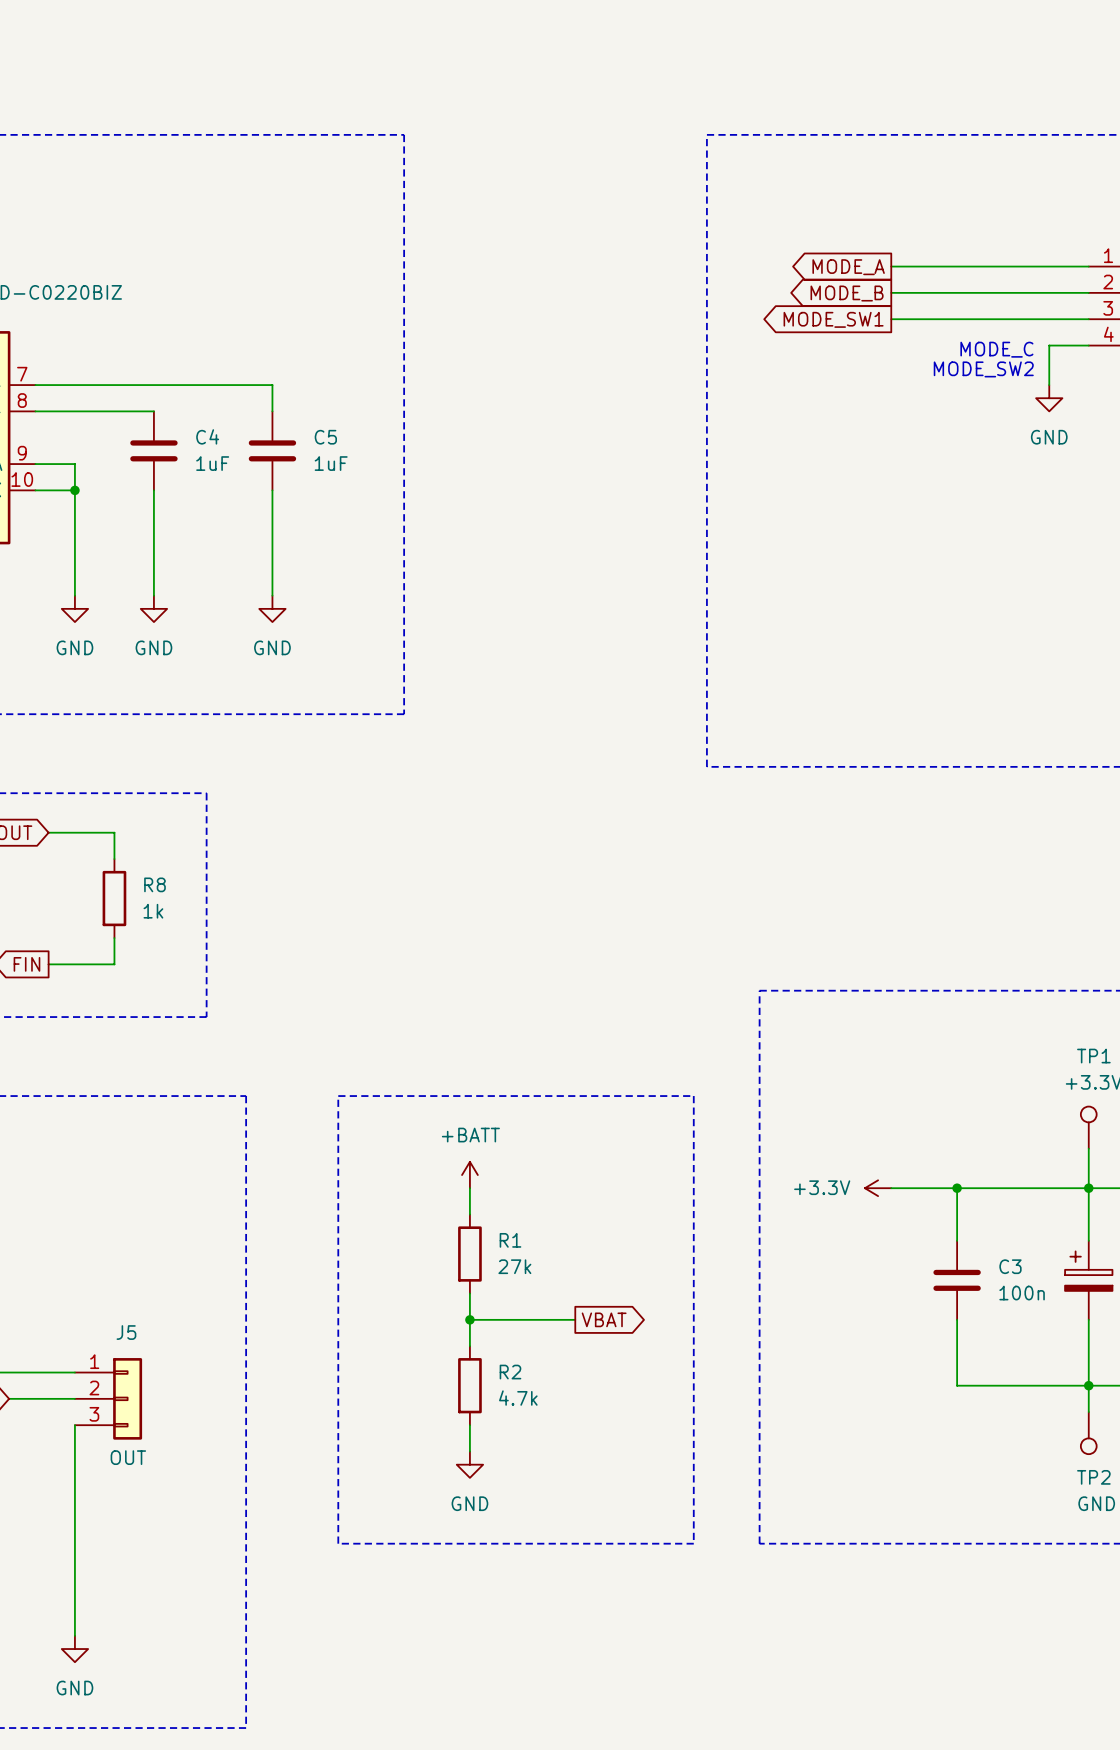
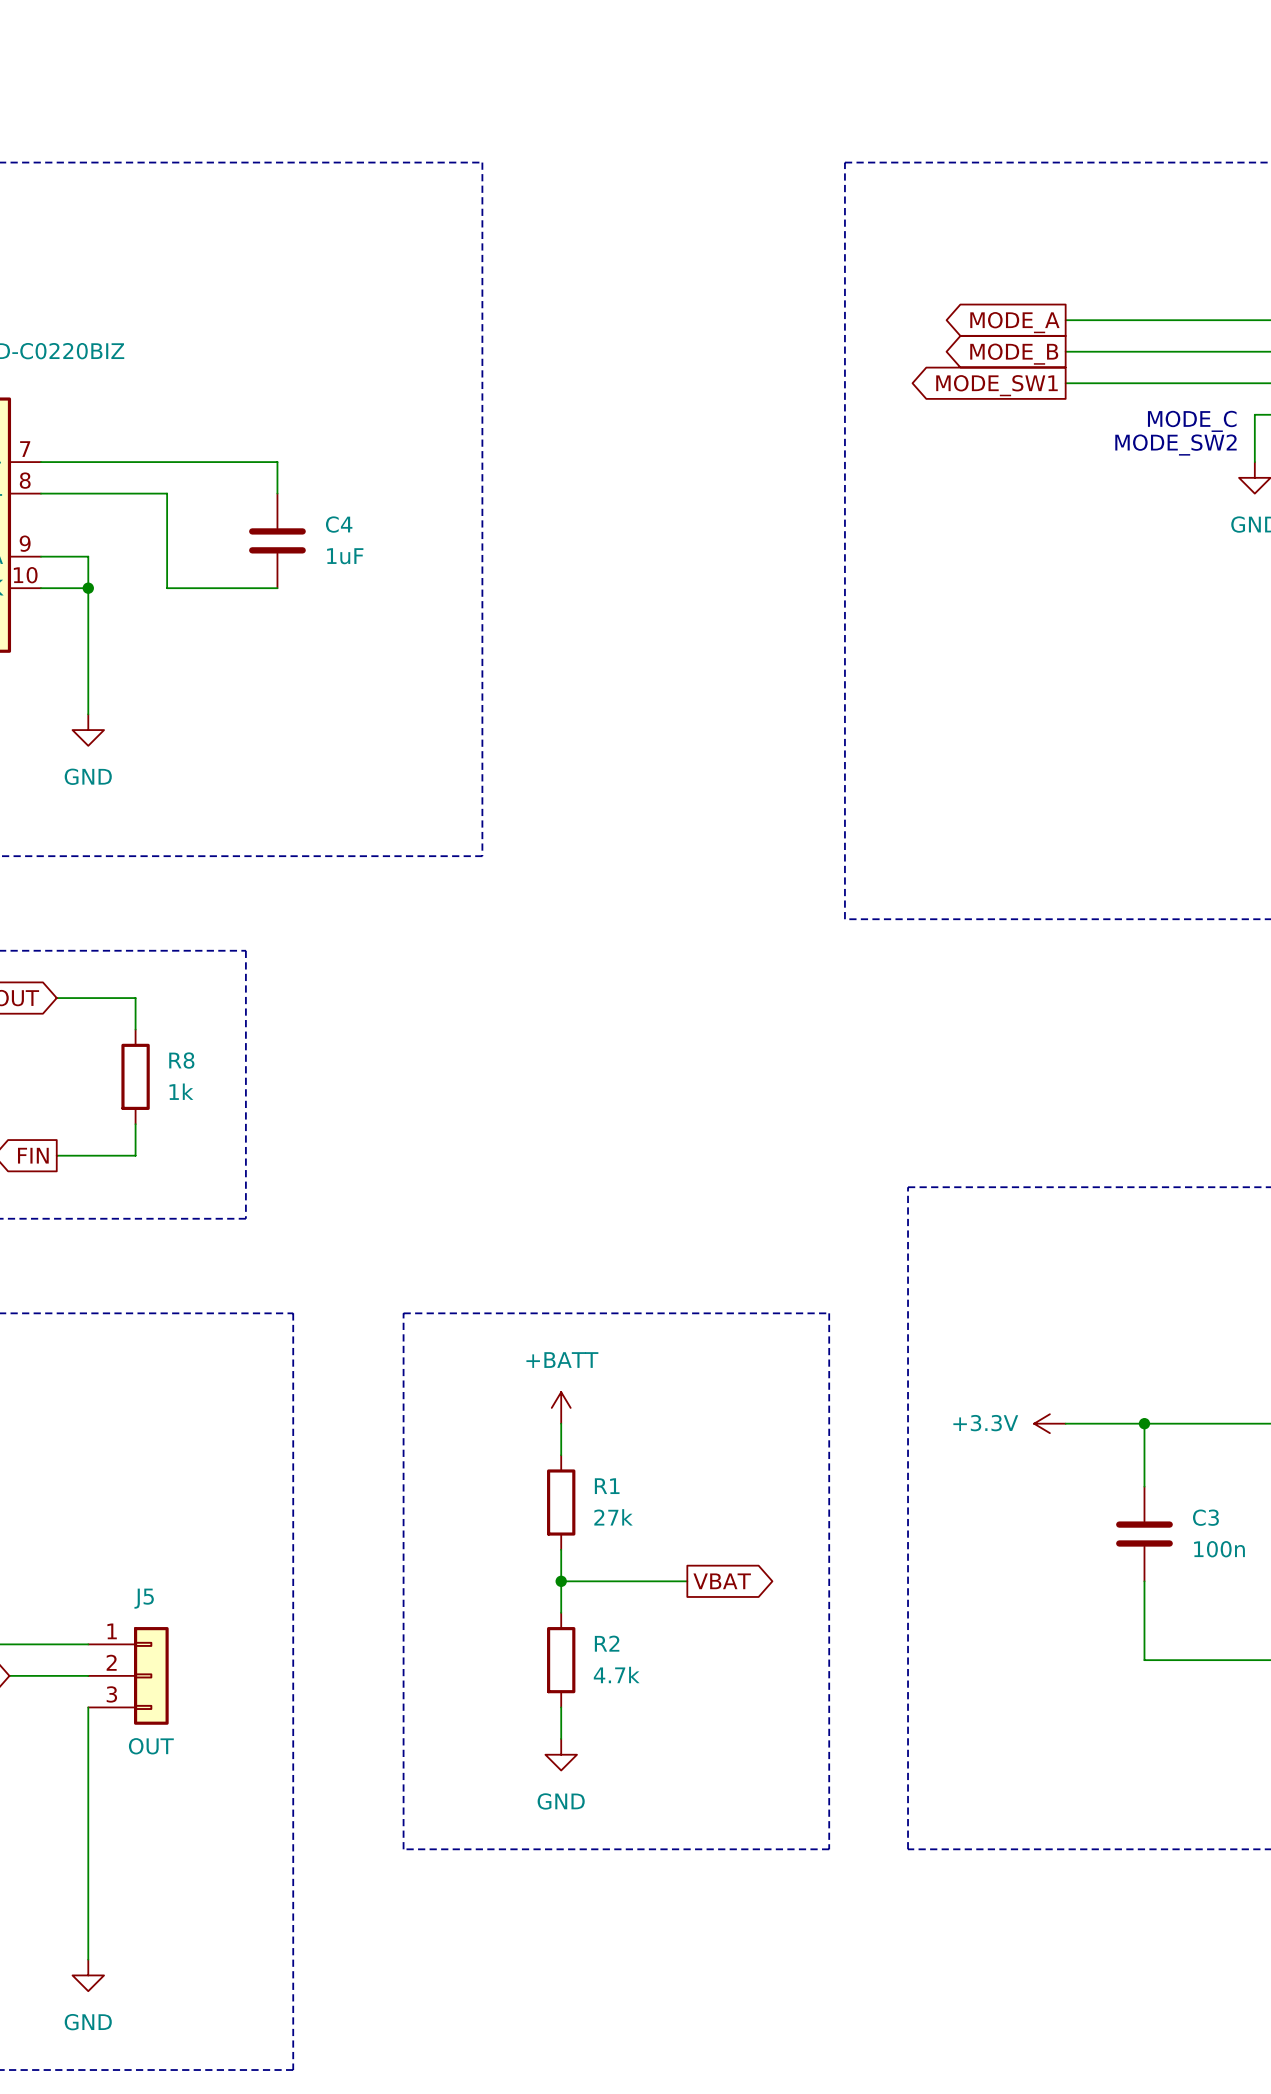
wire: (232, 385) (272, 385) (272, 411) -> (277, 462) (277, 493)
wire: (140, 411) (153, 411) -> (167, 493) (167, 588) (277, 588)
C4 position: (153, 450) -> (277, 540)
C5: 1uF (272, 450) -> none
wire: (153, 490) (153, 595) -> none
wire: (272, 490) (272, 595) -> none
power symbol: GND (153, 608) -> none
power symbol: GND (272, 608) -> none

